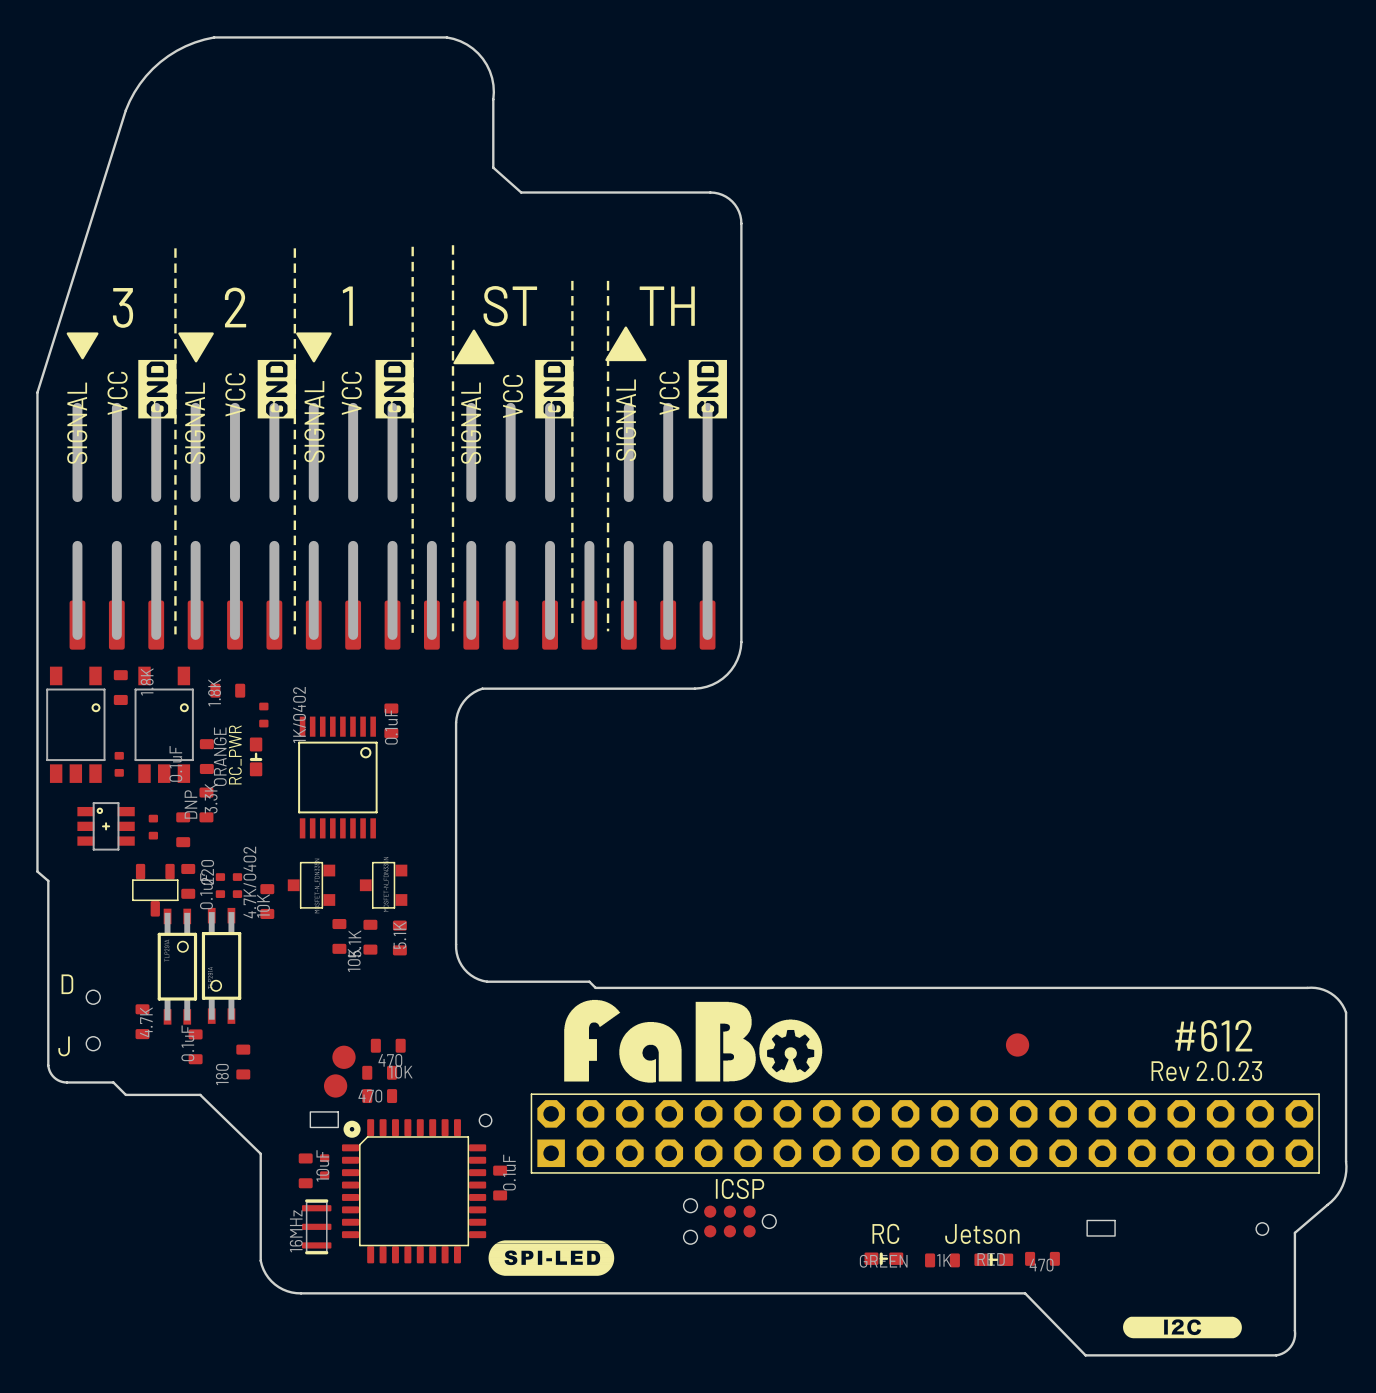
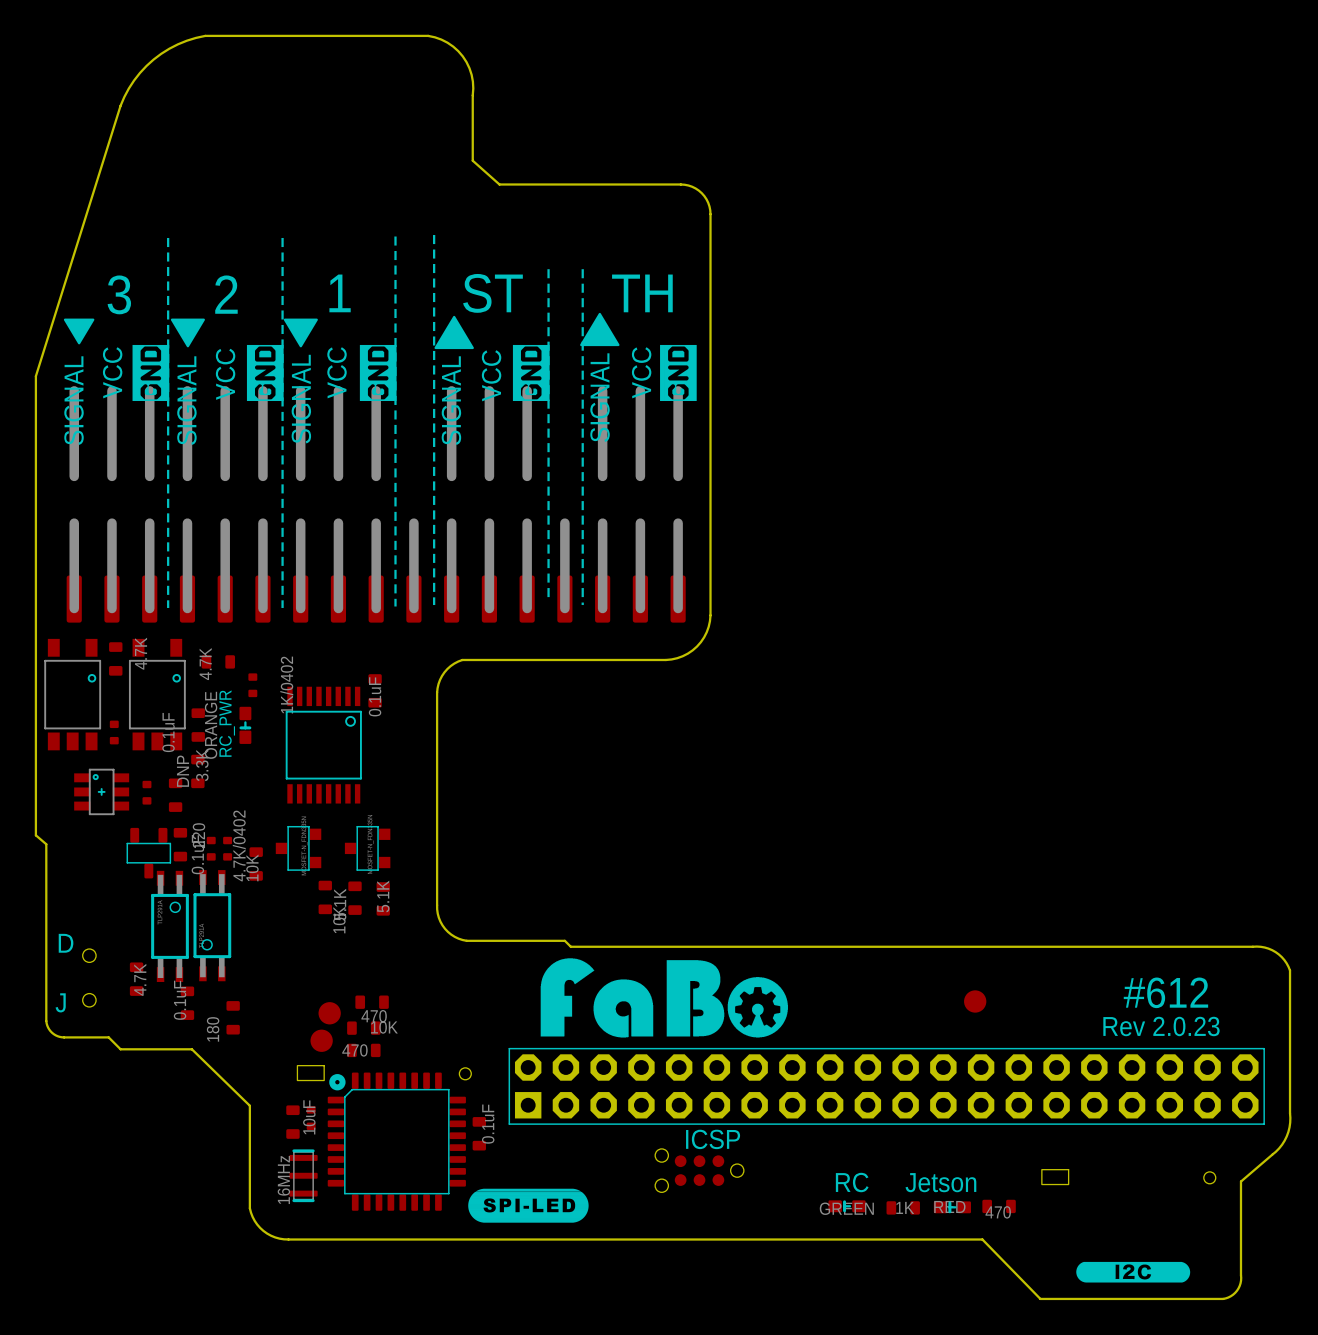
part value: 1.8K (147, 681) -> 4.7K (141, 653)
part value: 1.8K (214, 692) -> 4.7K (205, 664)

